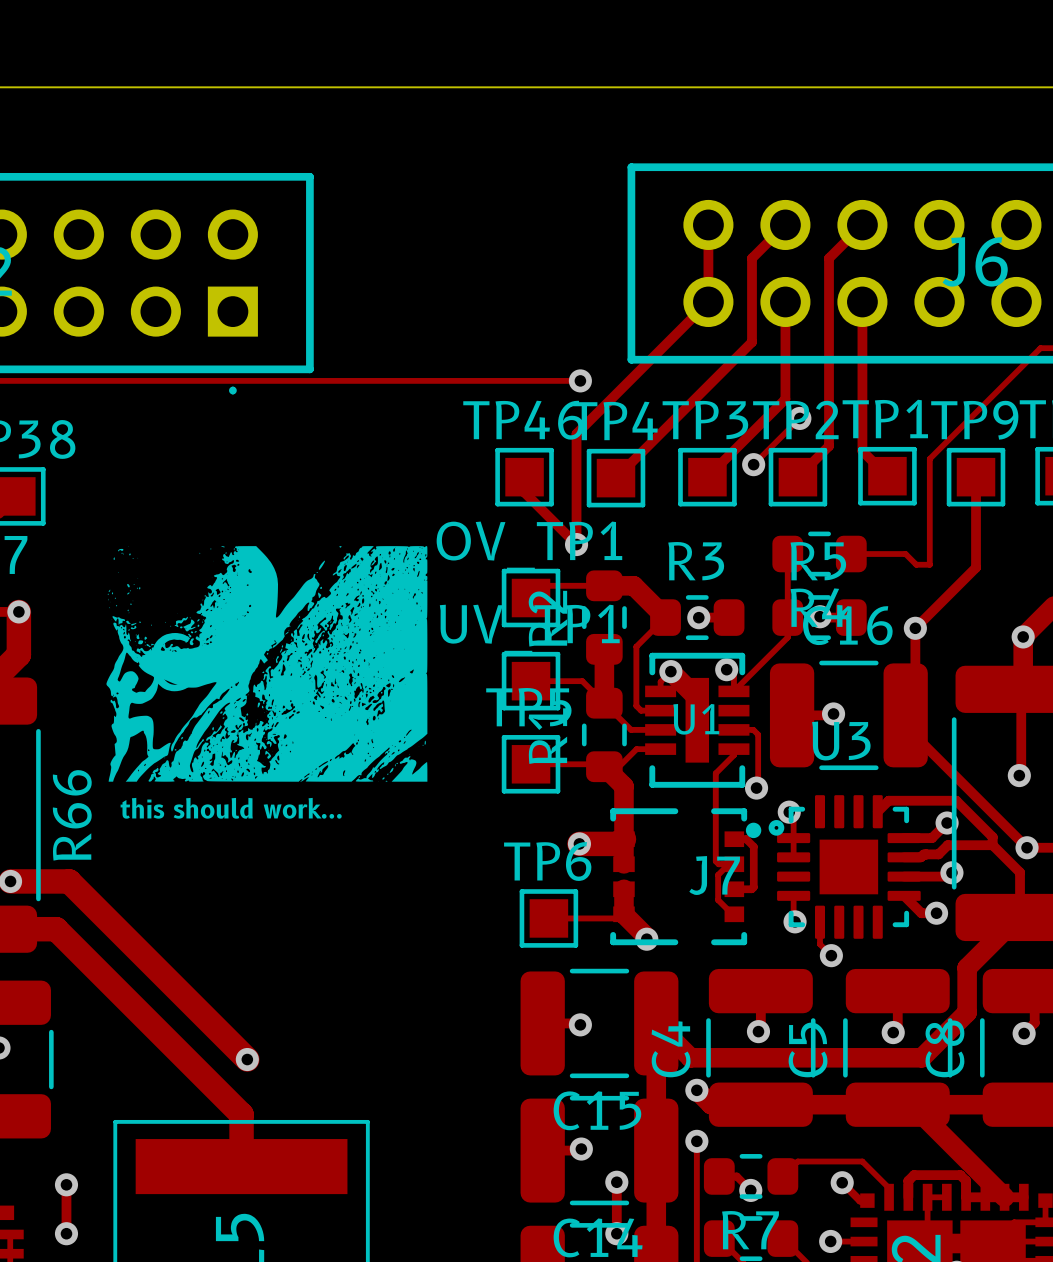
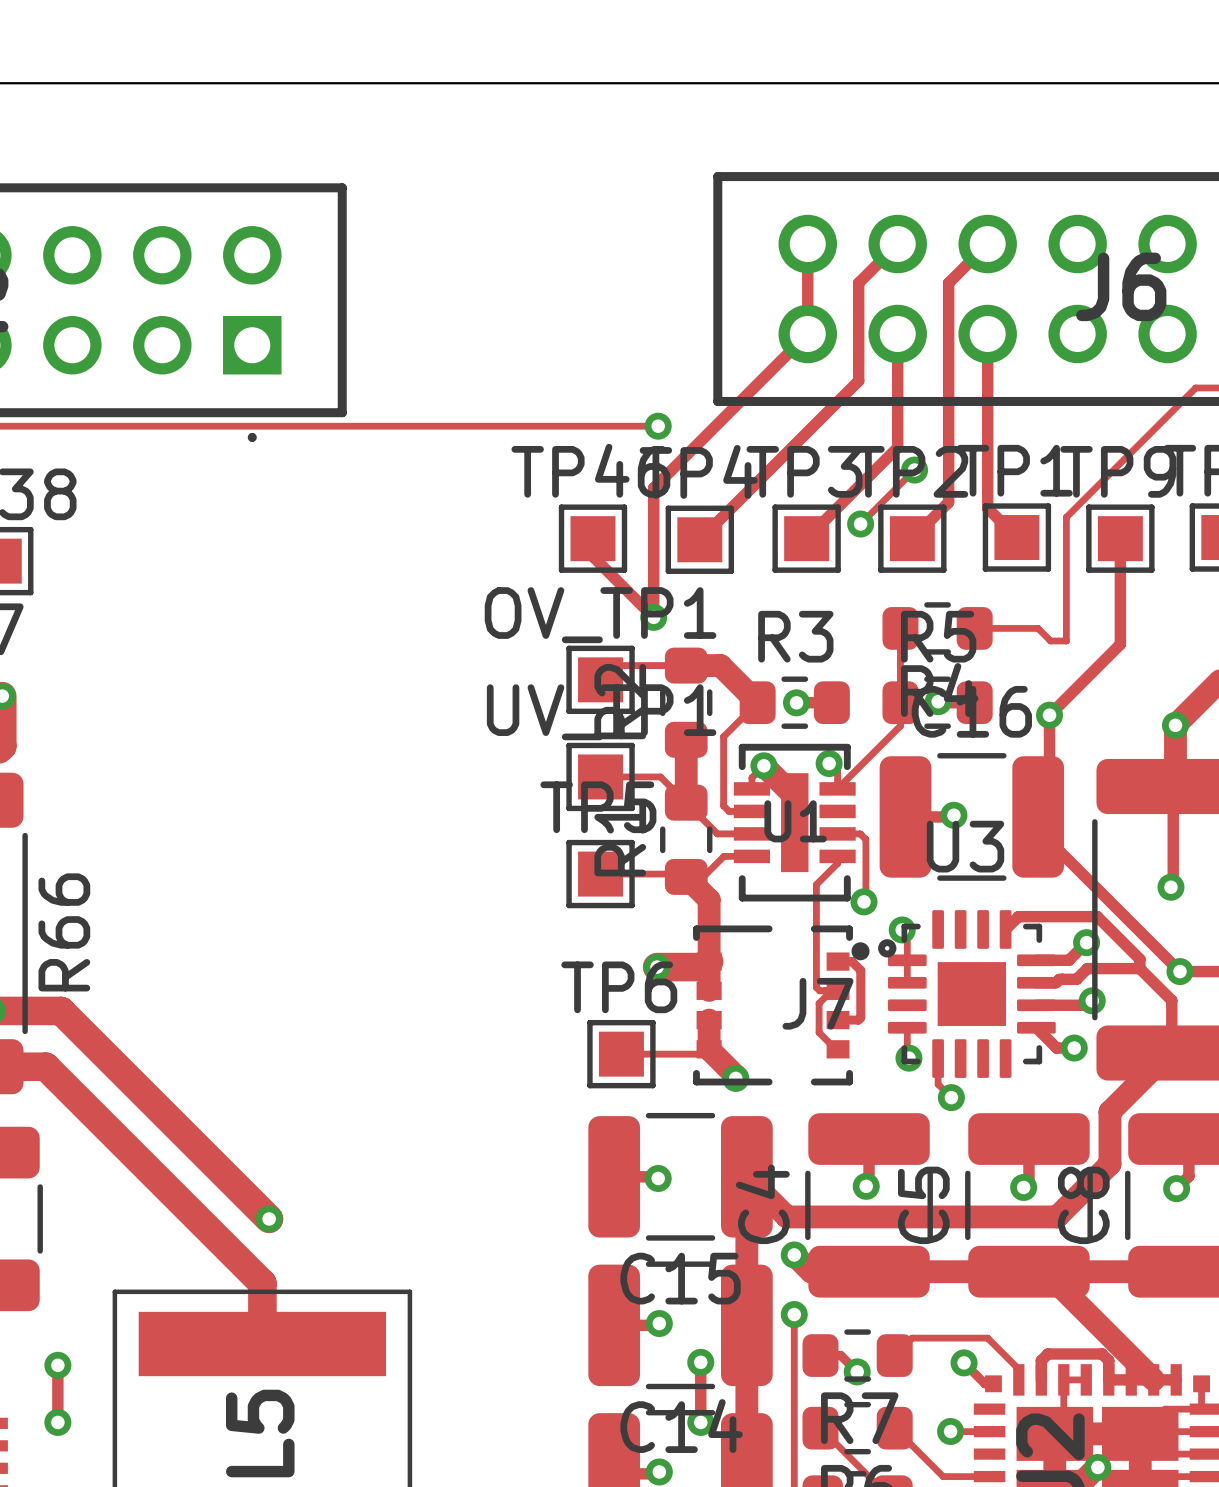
part: (266, 663) -> none
text: this should work... (231, 808) -> none

